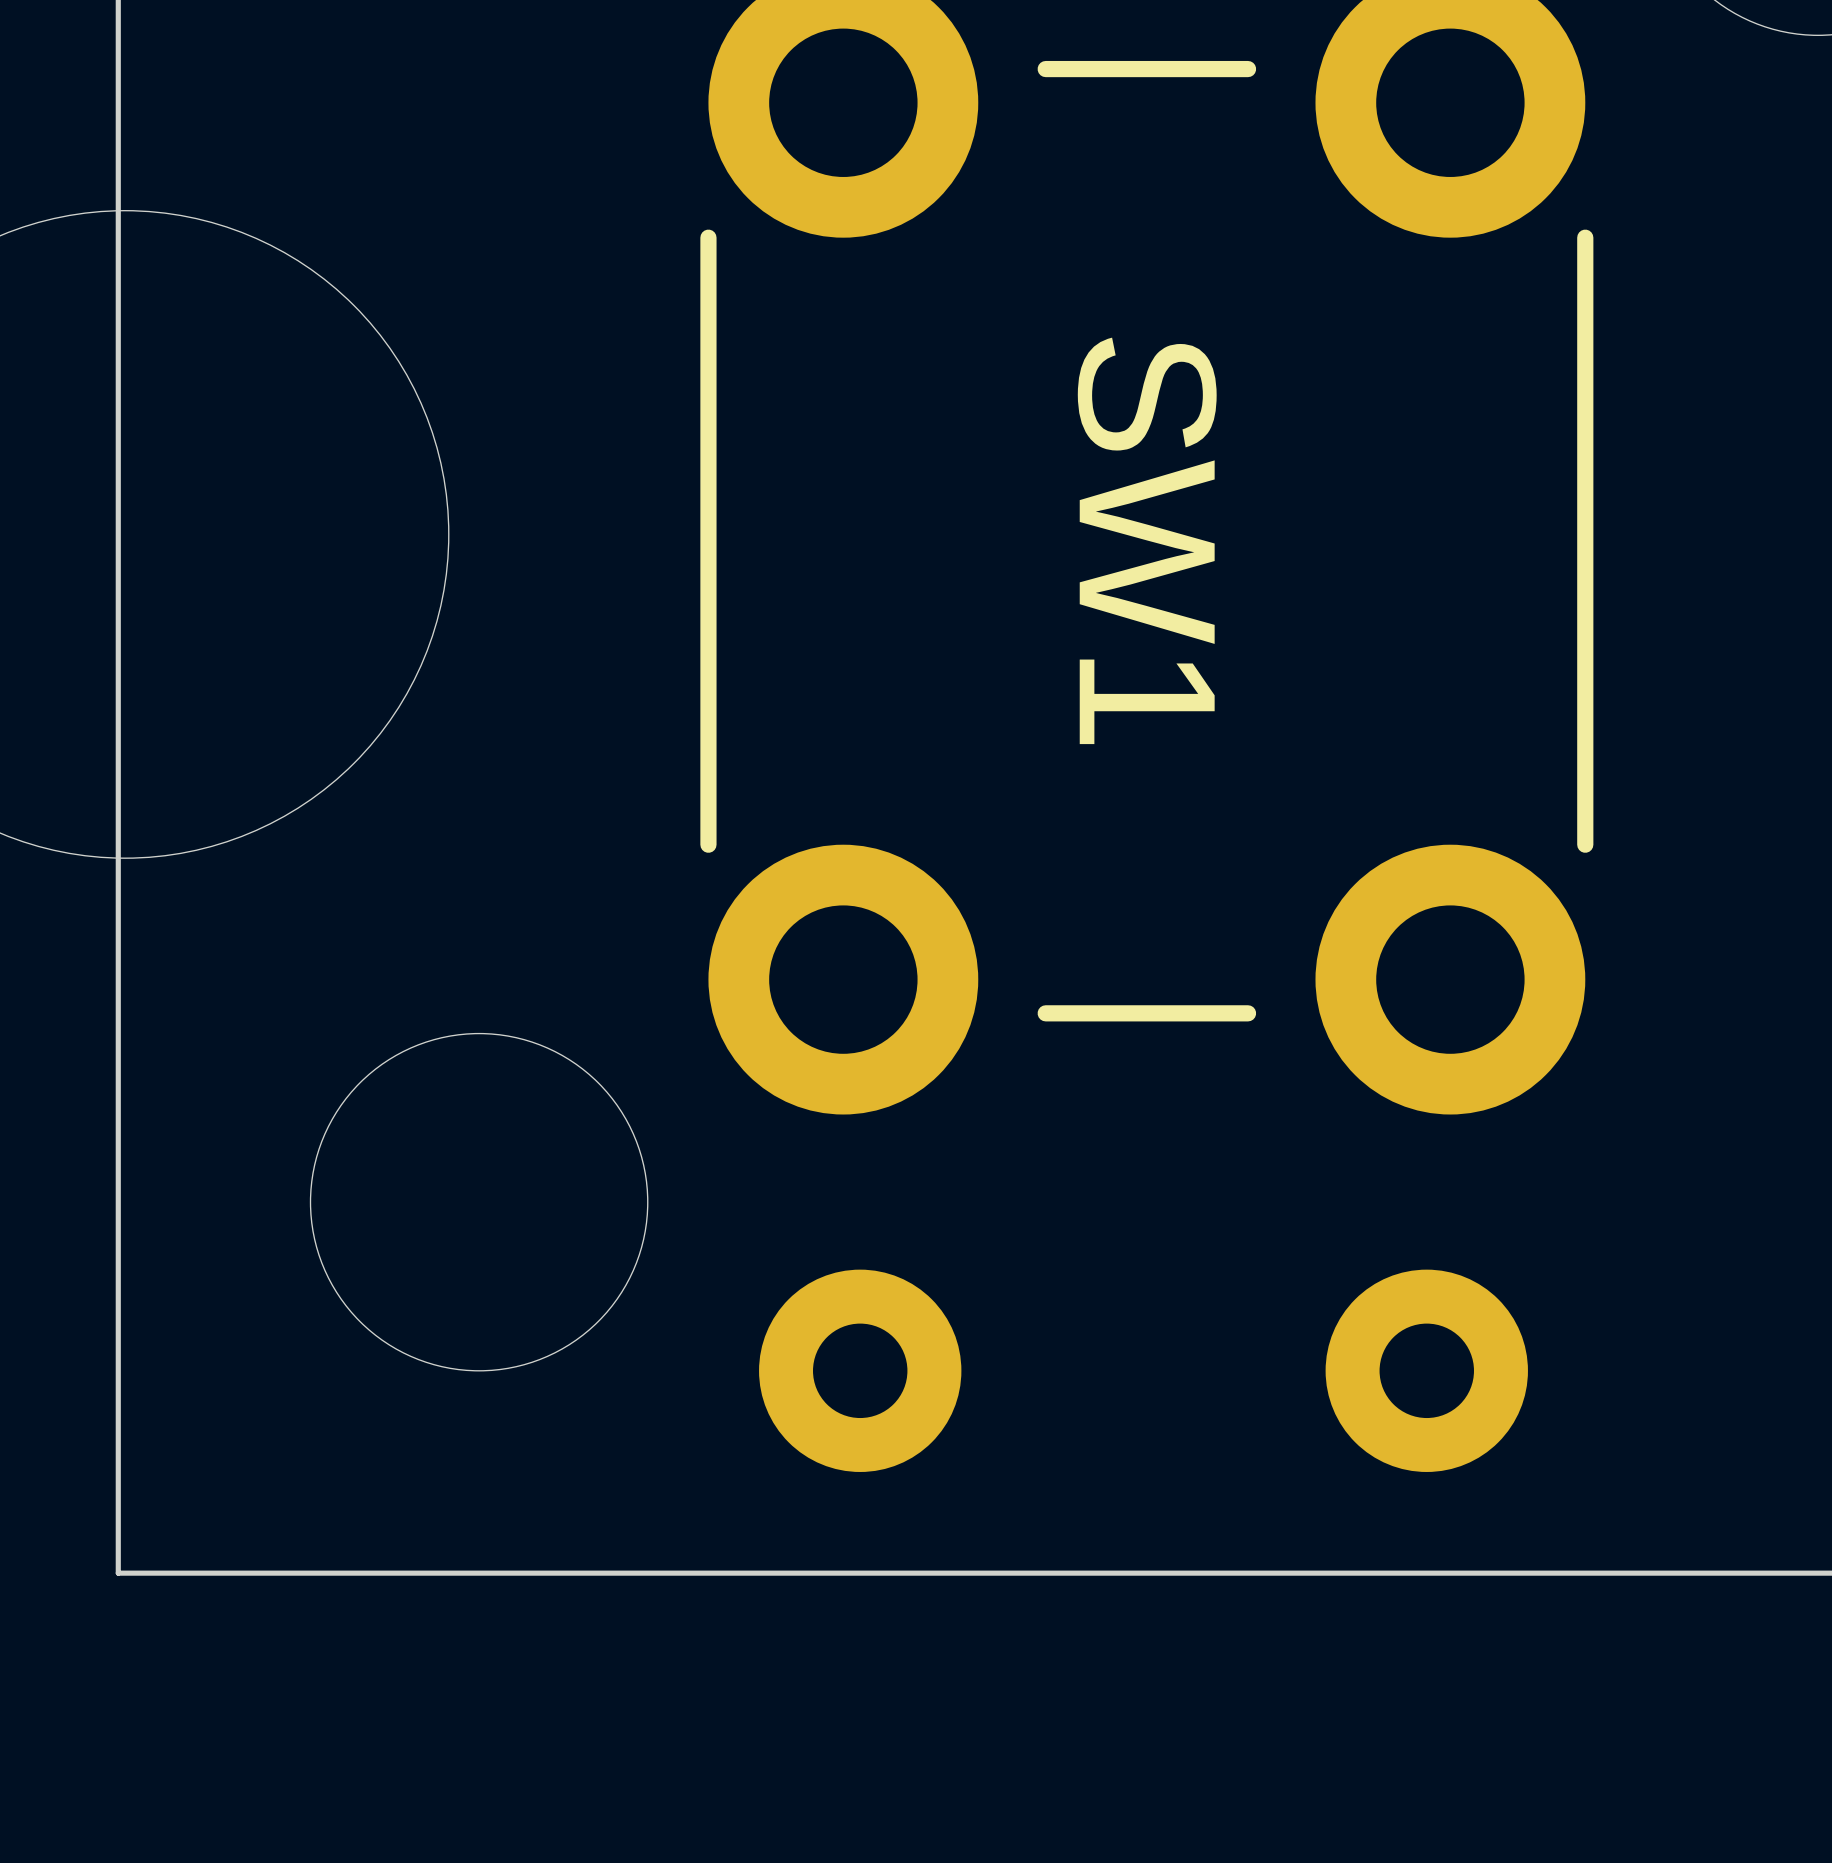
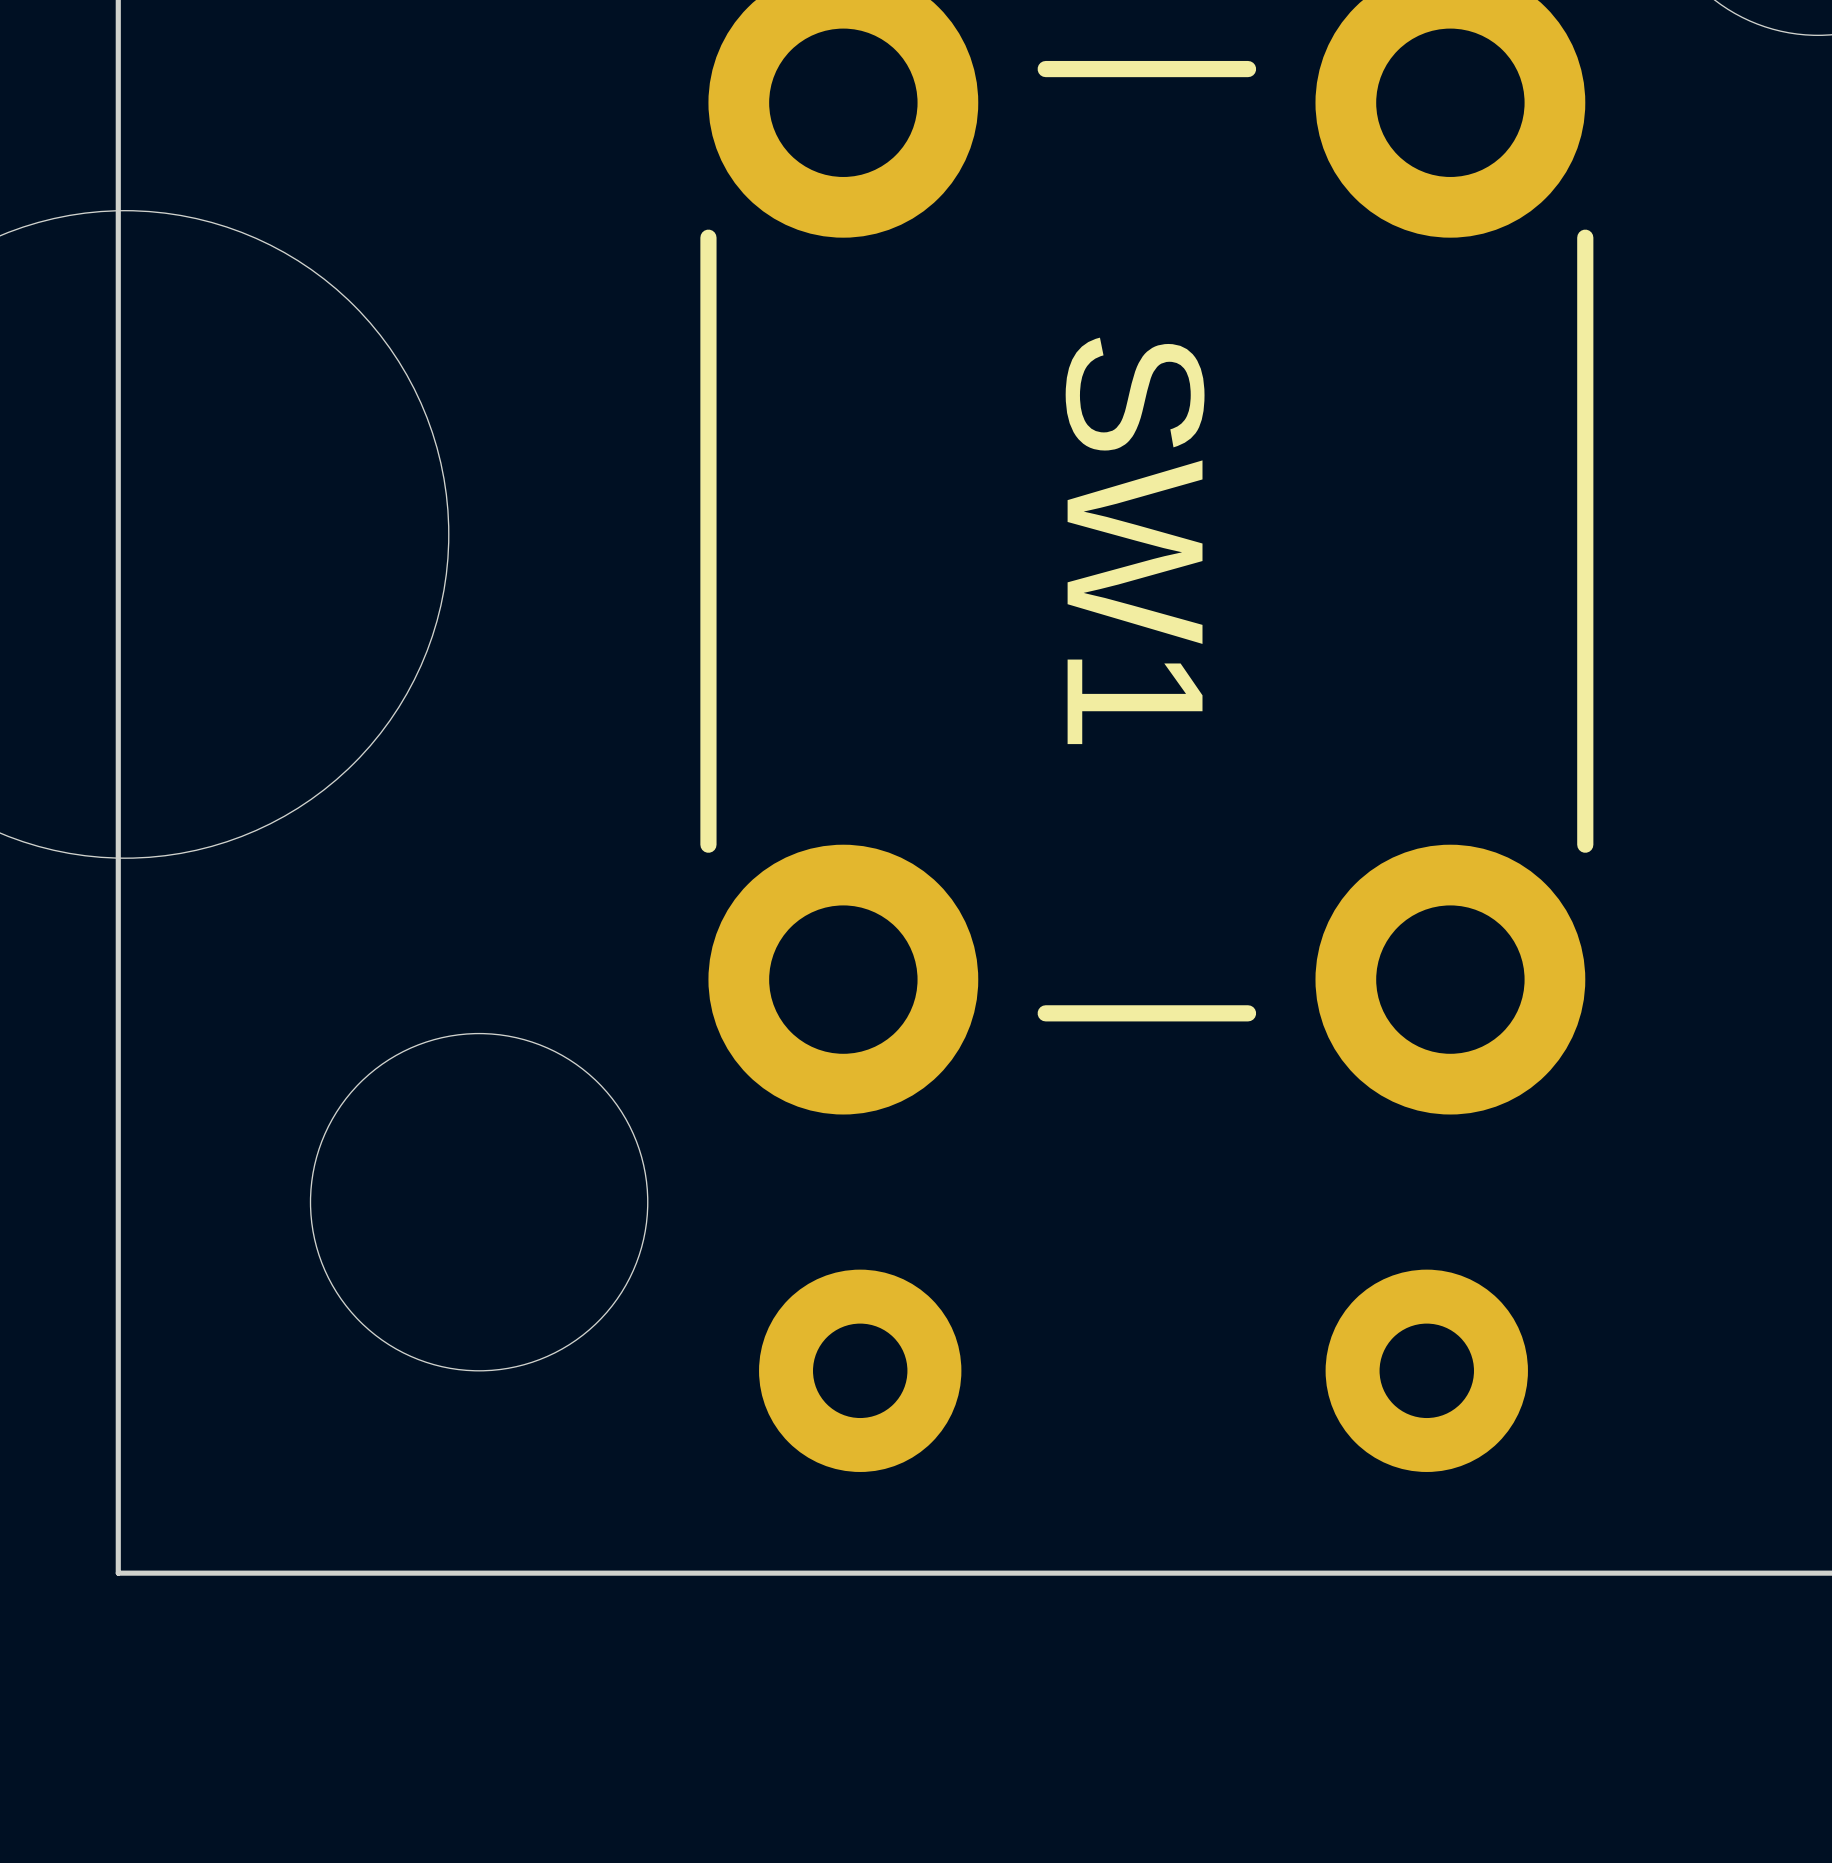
SW1 name position: SW1 (1147, 540) -> SW1 (1135, 540)

